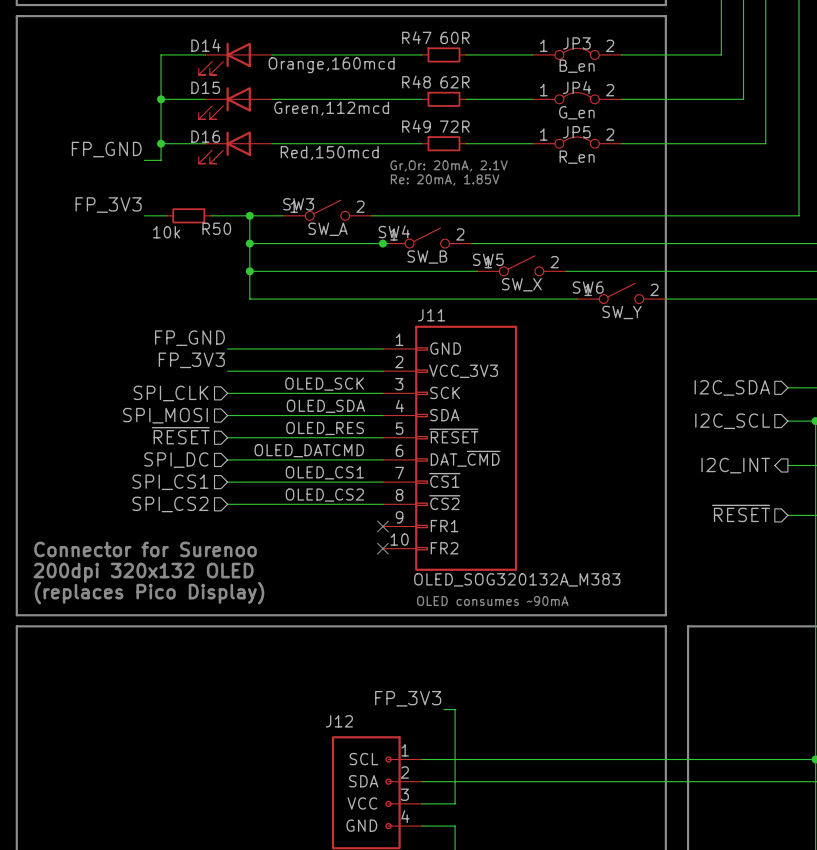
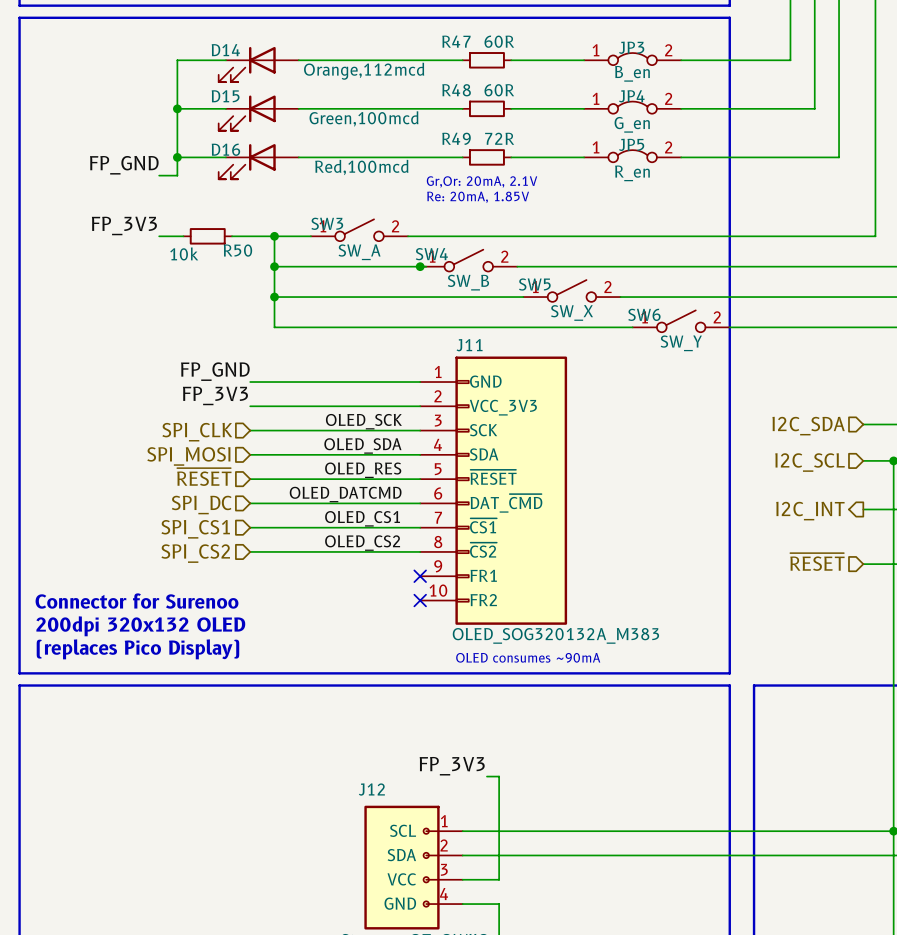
D14 value: Orange,160mcd (331, 65) -> Orange,112mcd (364, 71)
R48 value: 62R (455, 82) -> 60R (499, 90)
D15 value: Green,112mcd (331, 108) -> Green,100mcd (363, 118)
D16 value: Red,150mcd (329, 152) -> Red,100mcd (361, 167)

